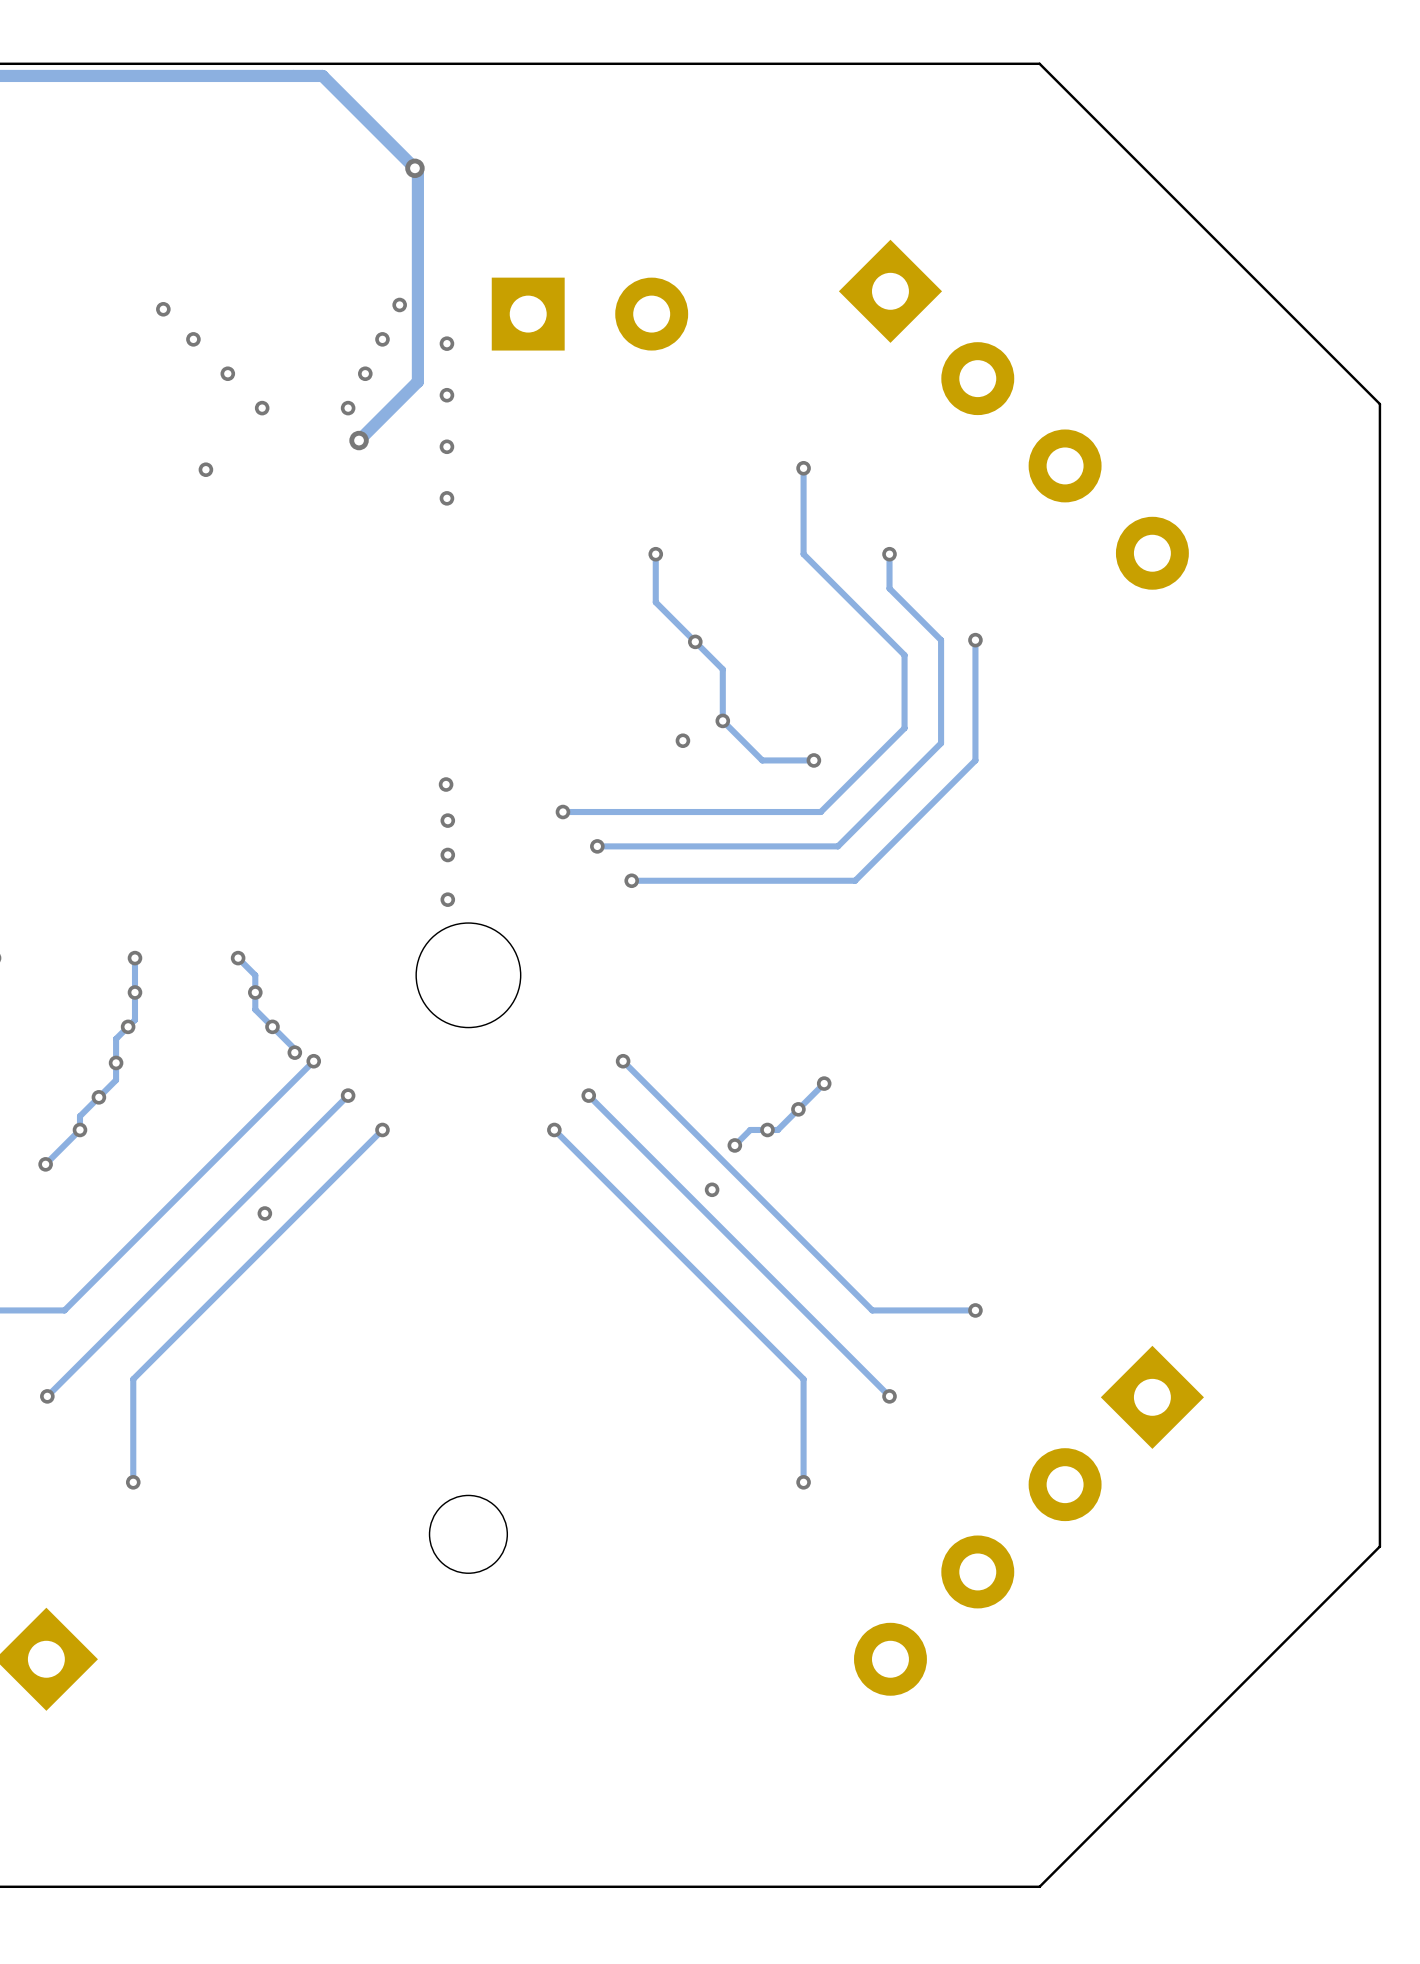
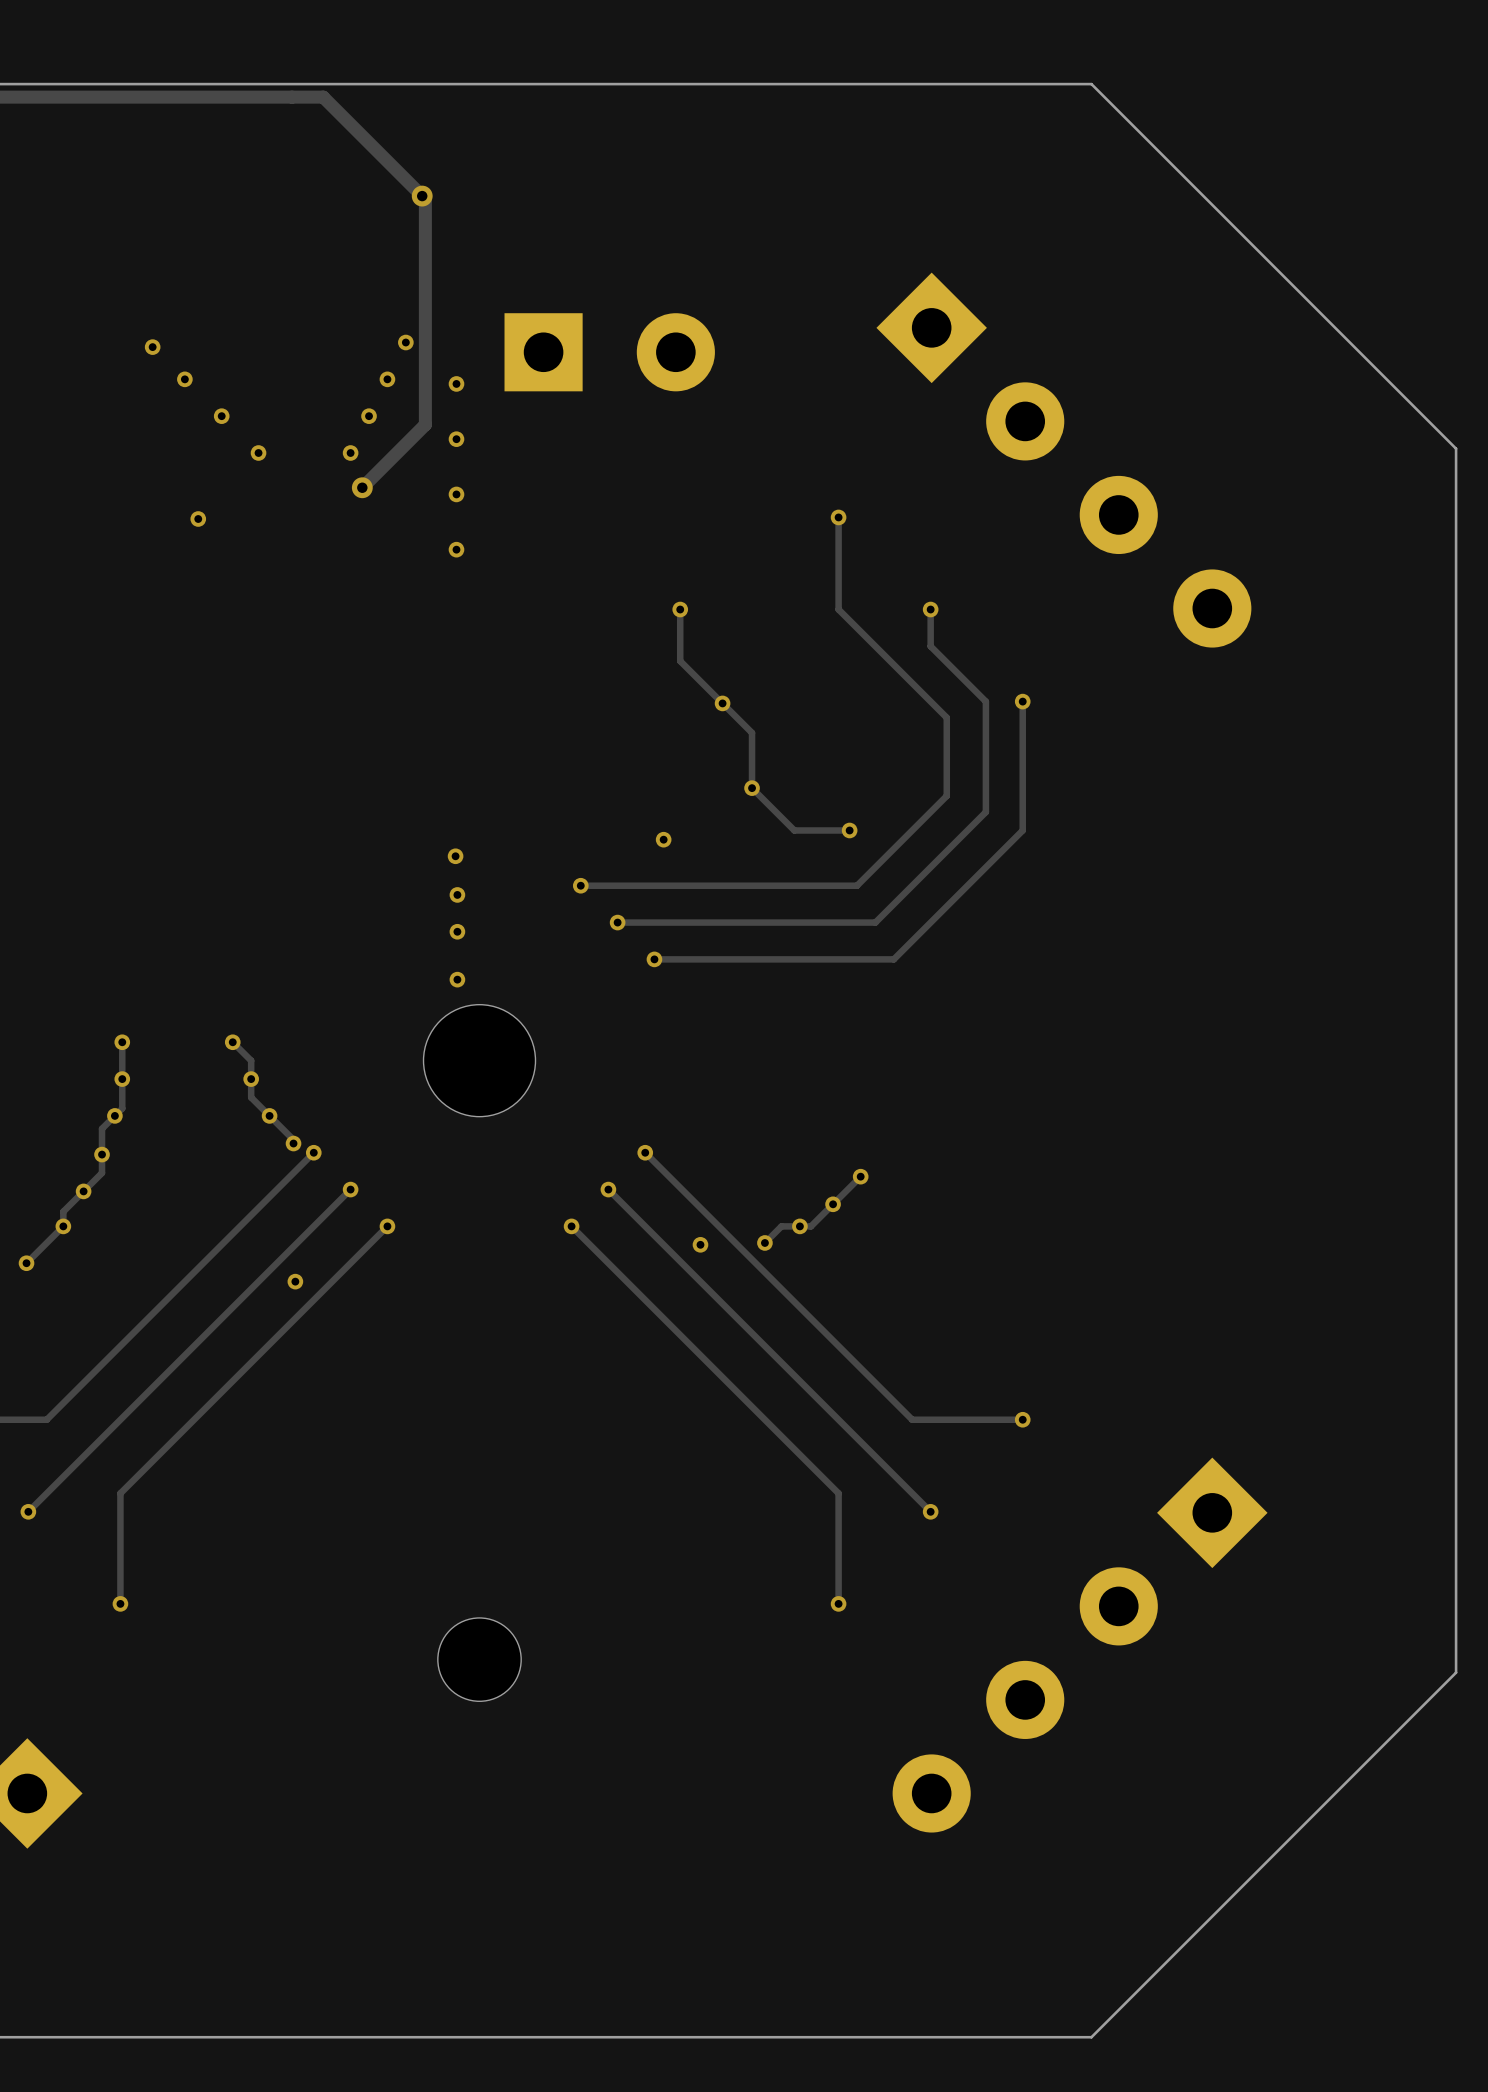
via position: (682, 740) -> (663, 839)
via position: (712, 1189) -> (700, 1244)
via position: (264, 1213) -> (295, 1281)

